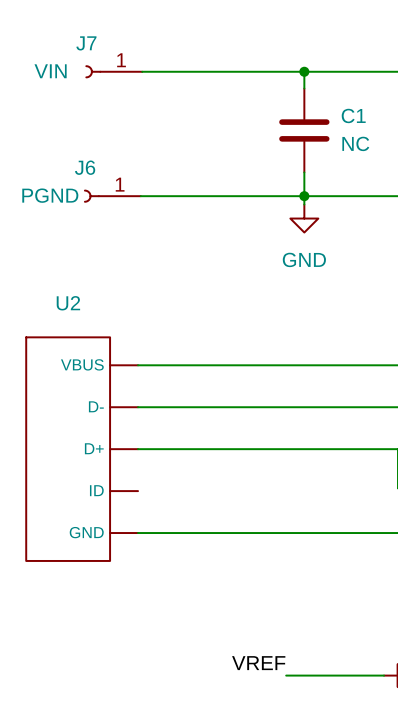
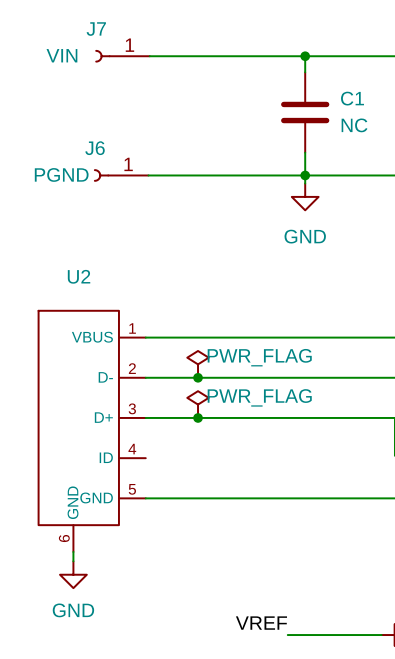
U2 symbol: [26, 337, 139, 561] -> [38, 310, 146, 552]
power symbol: none -> PWR_FLAG (198, 364)
junction: none -> (198, 377)
power symbol: none -> PWR_FLAG (198, 404)
junction: none -> (198, 417)
wire: none -> (73, 551) (73, 561)
power symbol: none -> GND (73, 574)

